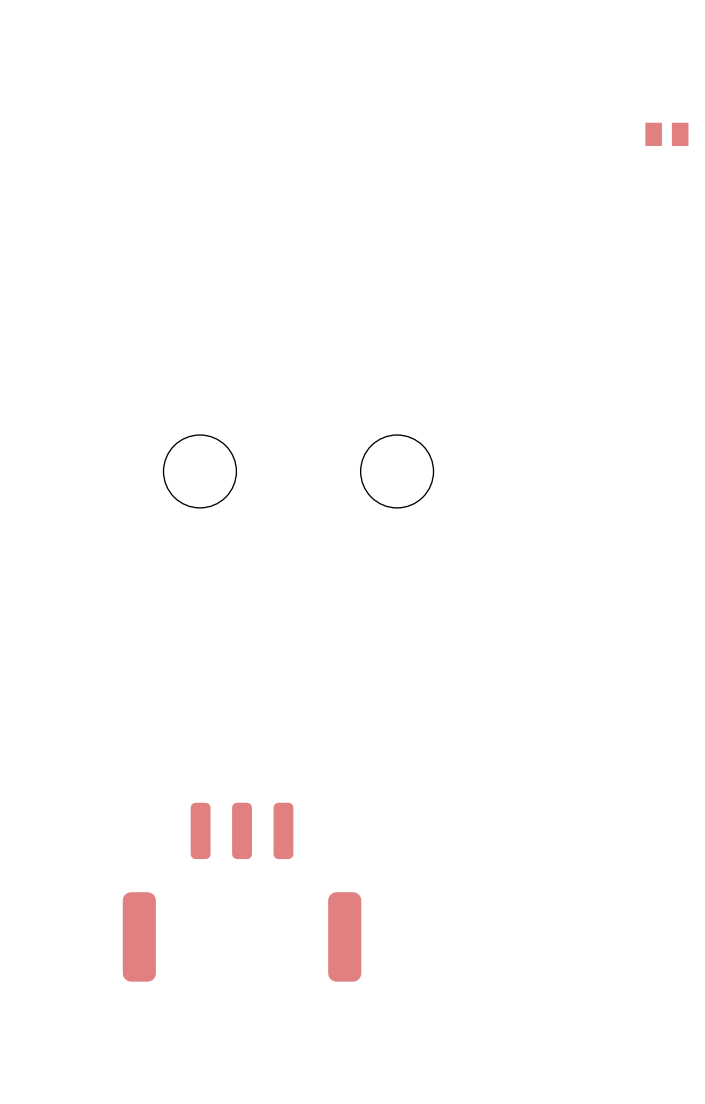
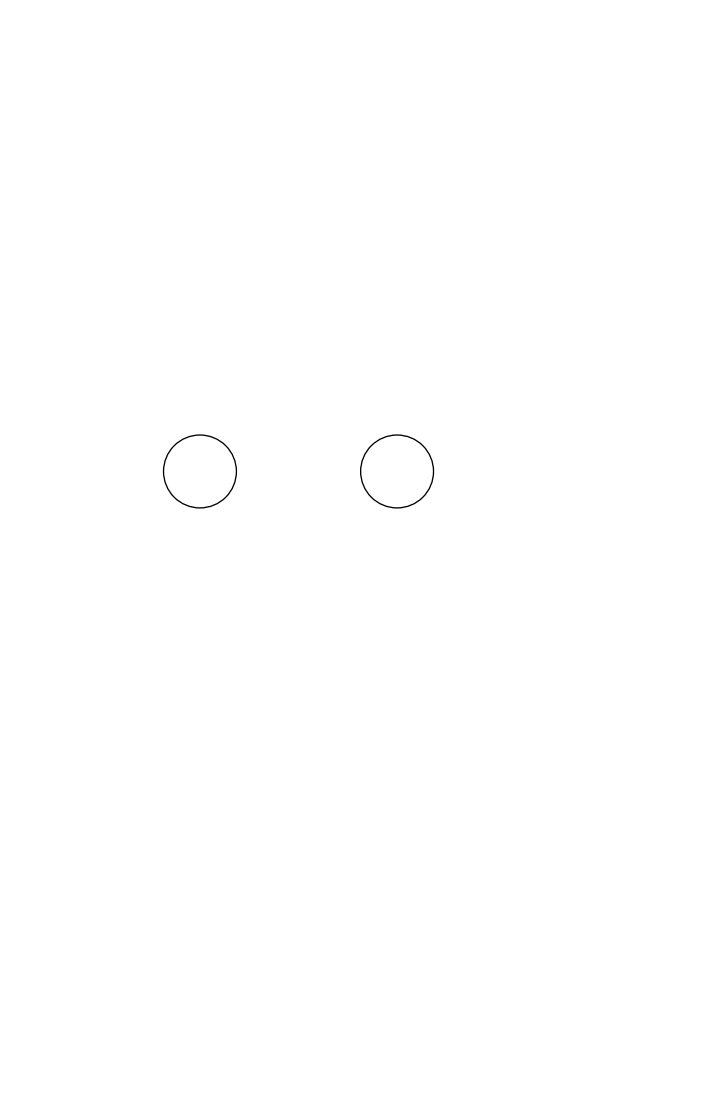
part: (666, 134) -> none
part: (242, 892) -> none

